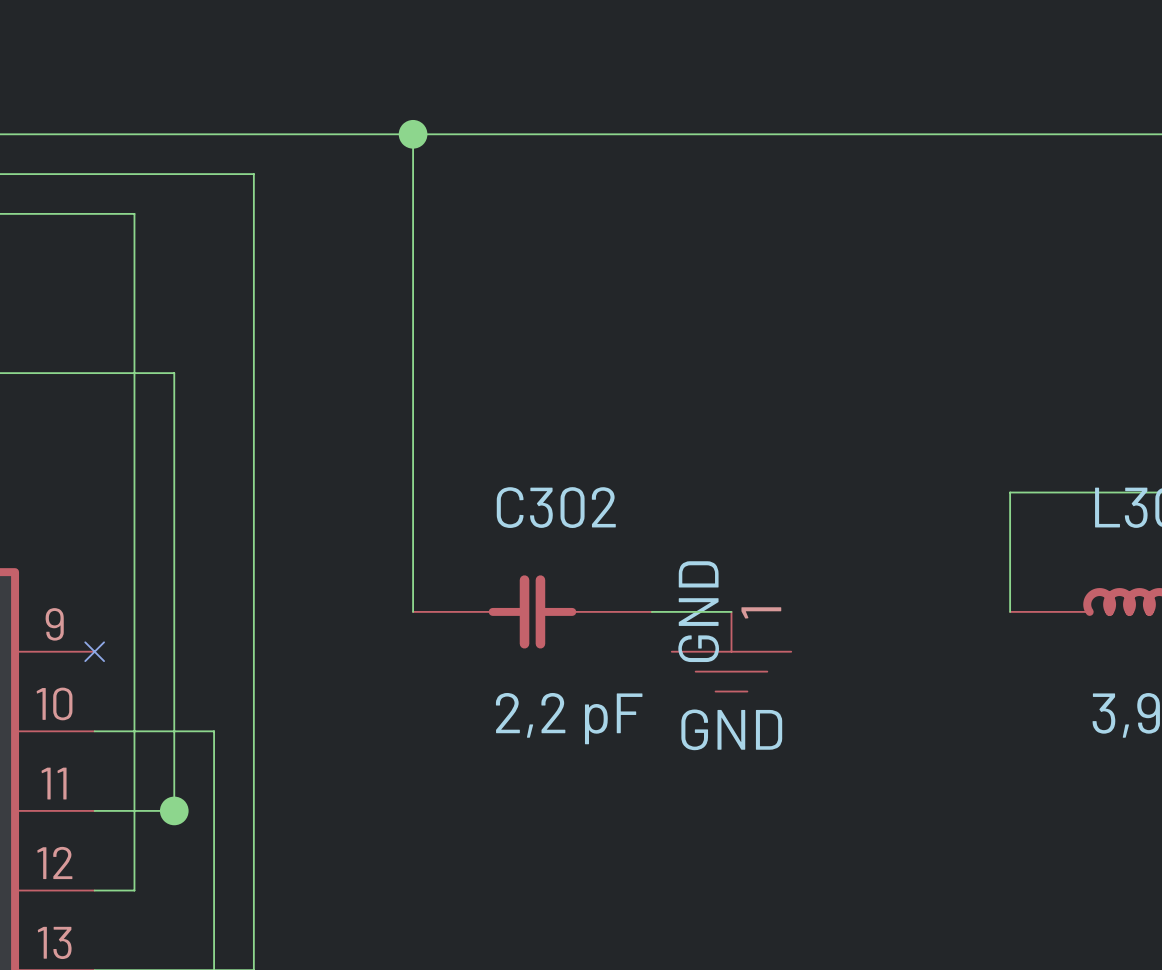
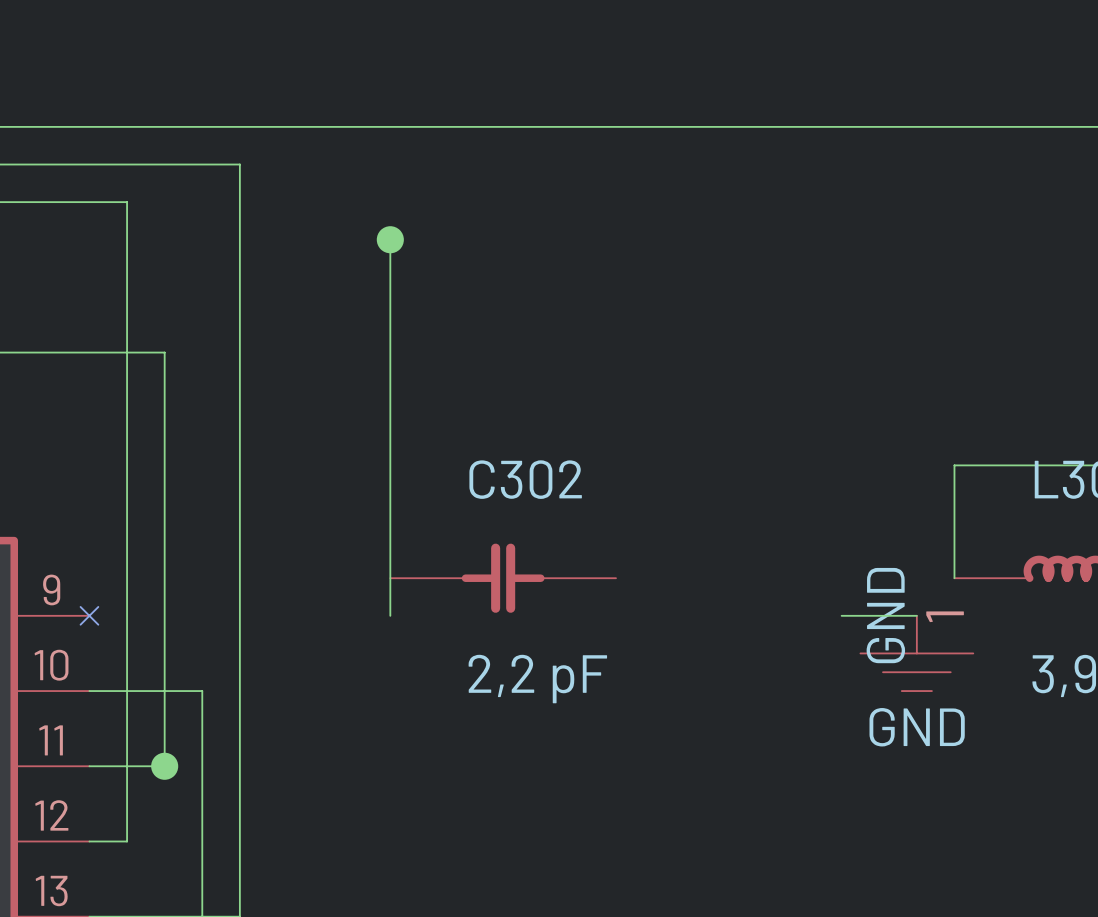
wire: (413, 134) (413, 253) -> none
junction position: (413, 134) -> (390, 239)
wire: none -> (390, 578) (390, 615)
wire: (651, 611) (731, 611) -> (841, 615) (916, 615)
power symbol position: GND (731, 651) -> GND (916, 653)

